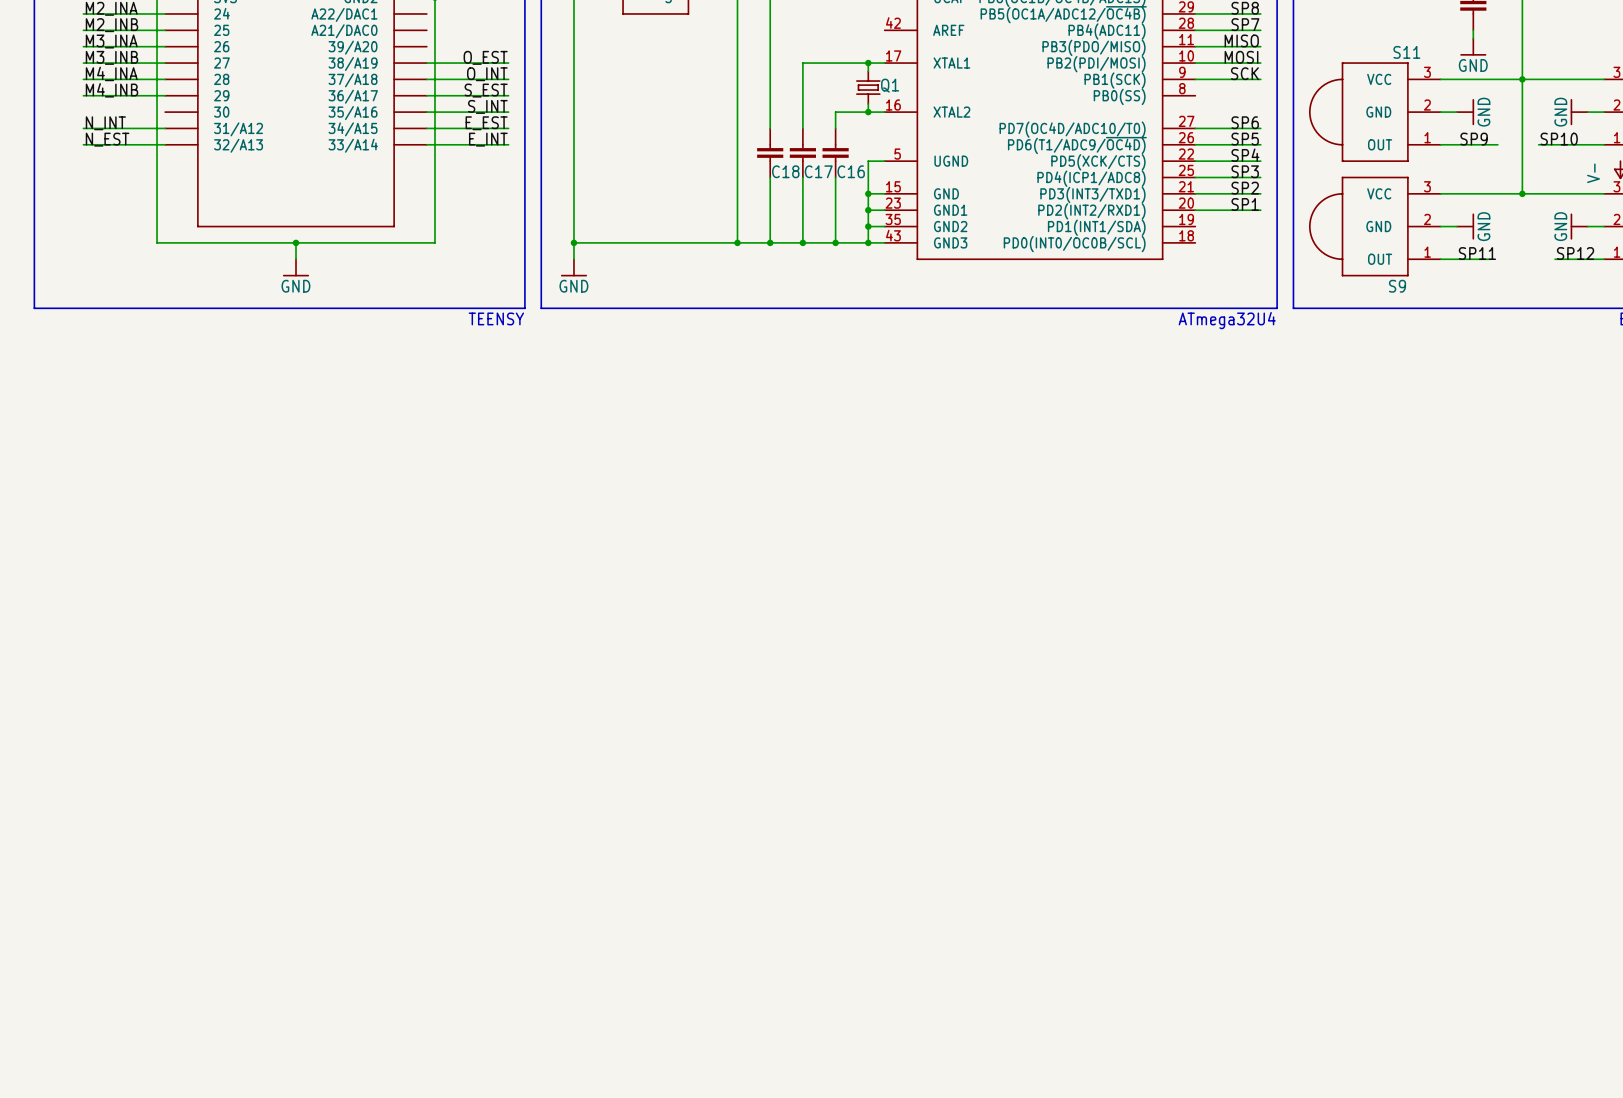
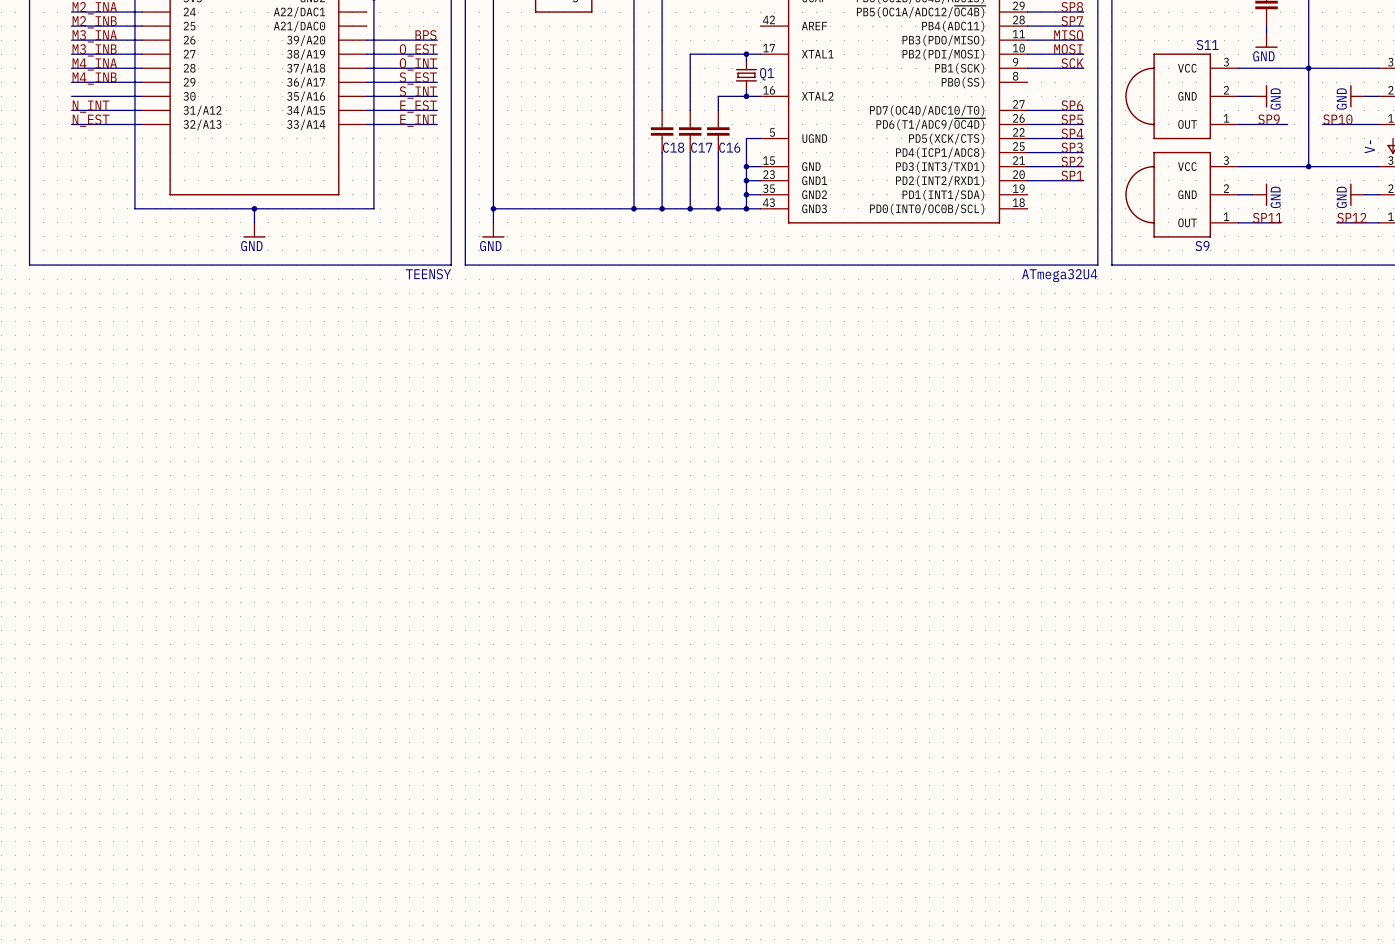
label: none -> BPS (425, 35)
wire: none -> (366, 40) (437, 40)
wire: none -> (71, 96) (142, 96)

